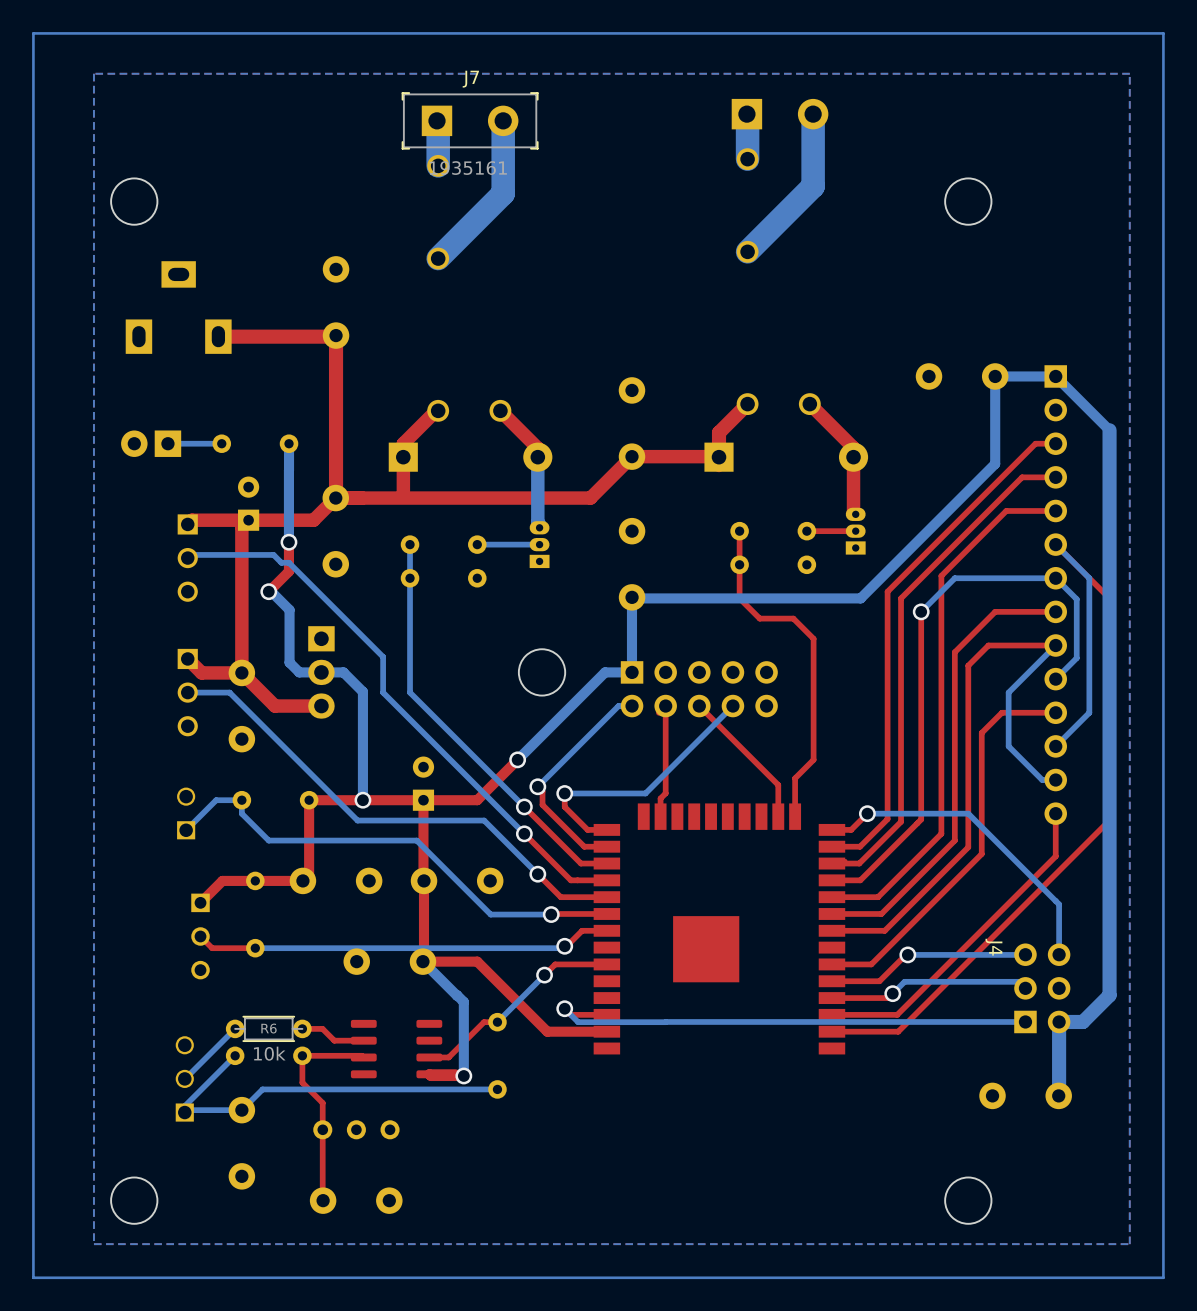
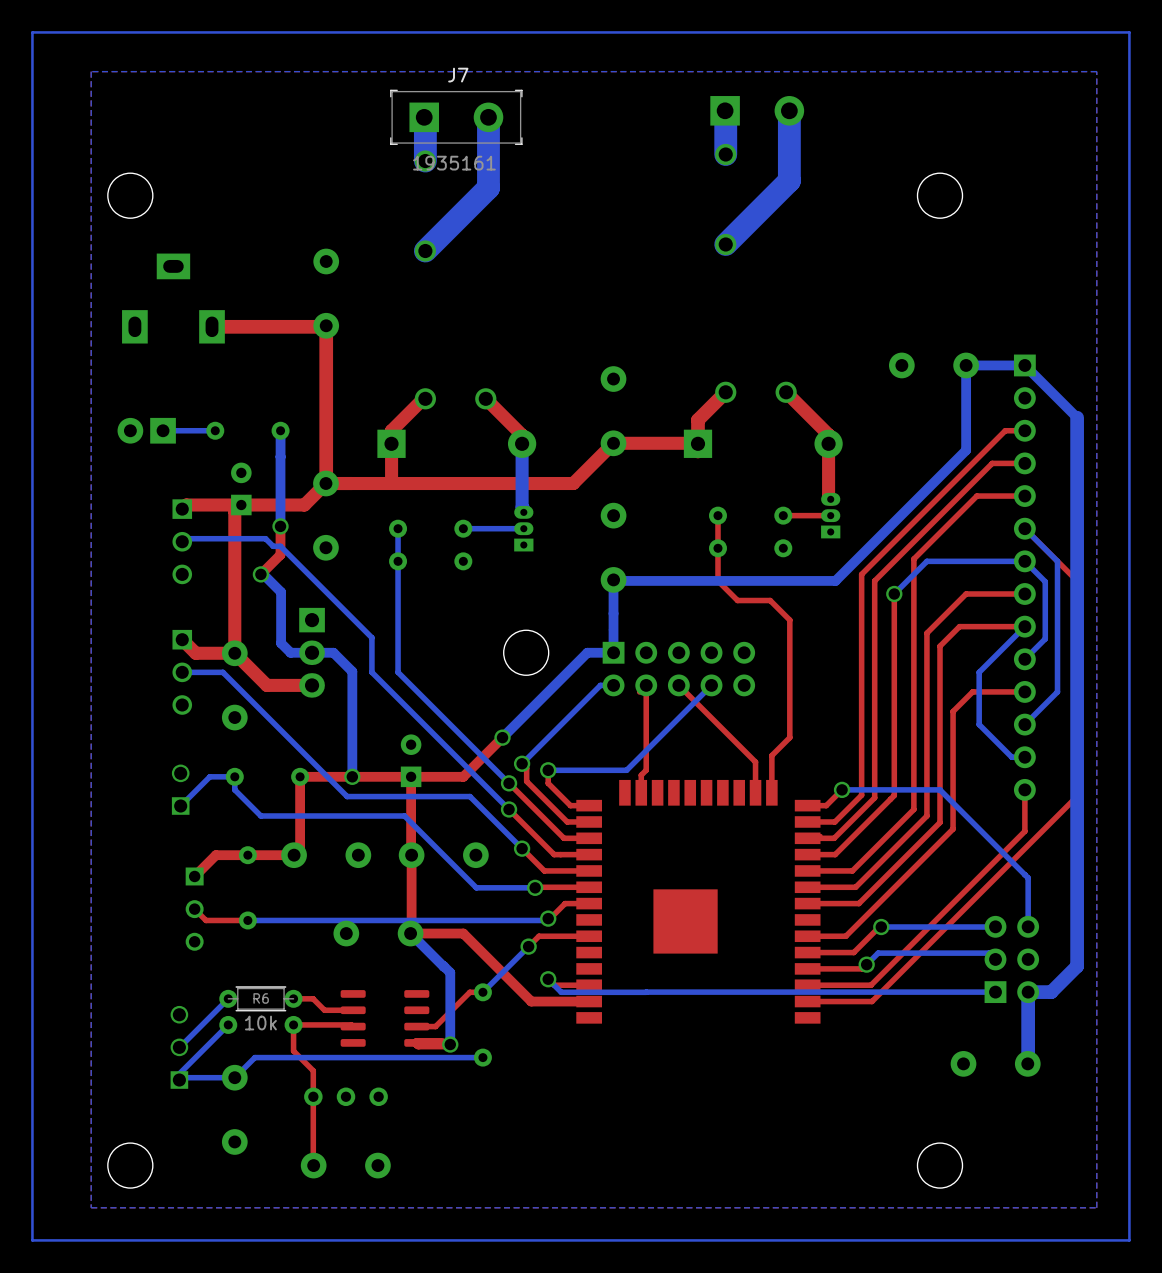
J4 name: J4 (993, 947) -> none

